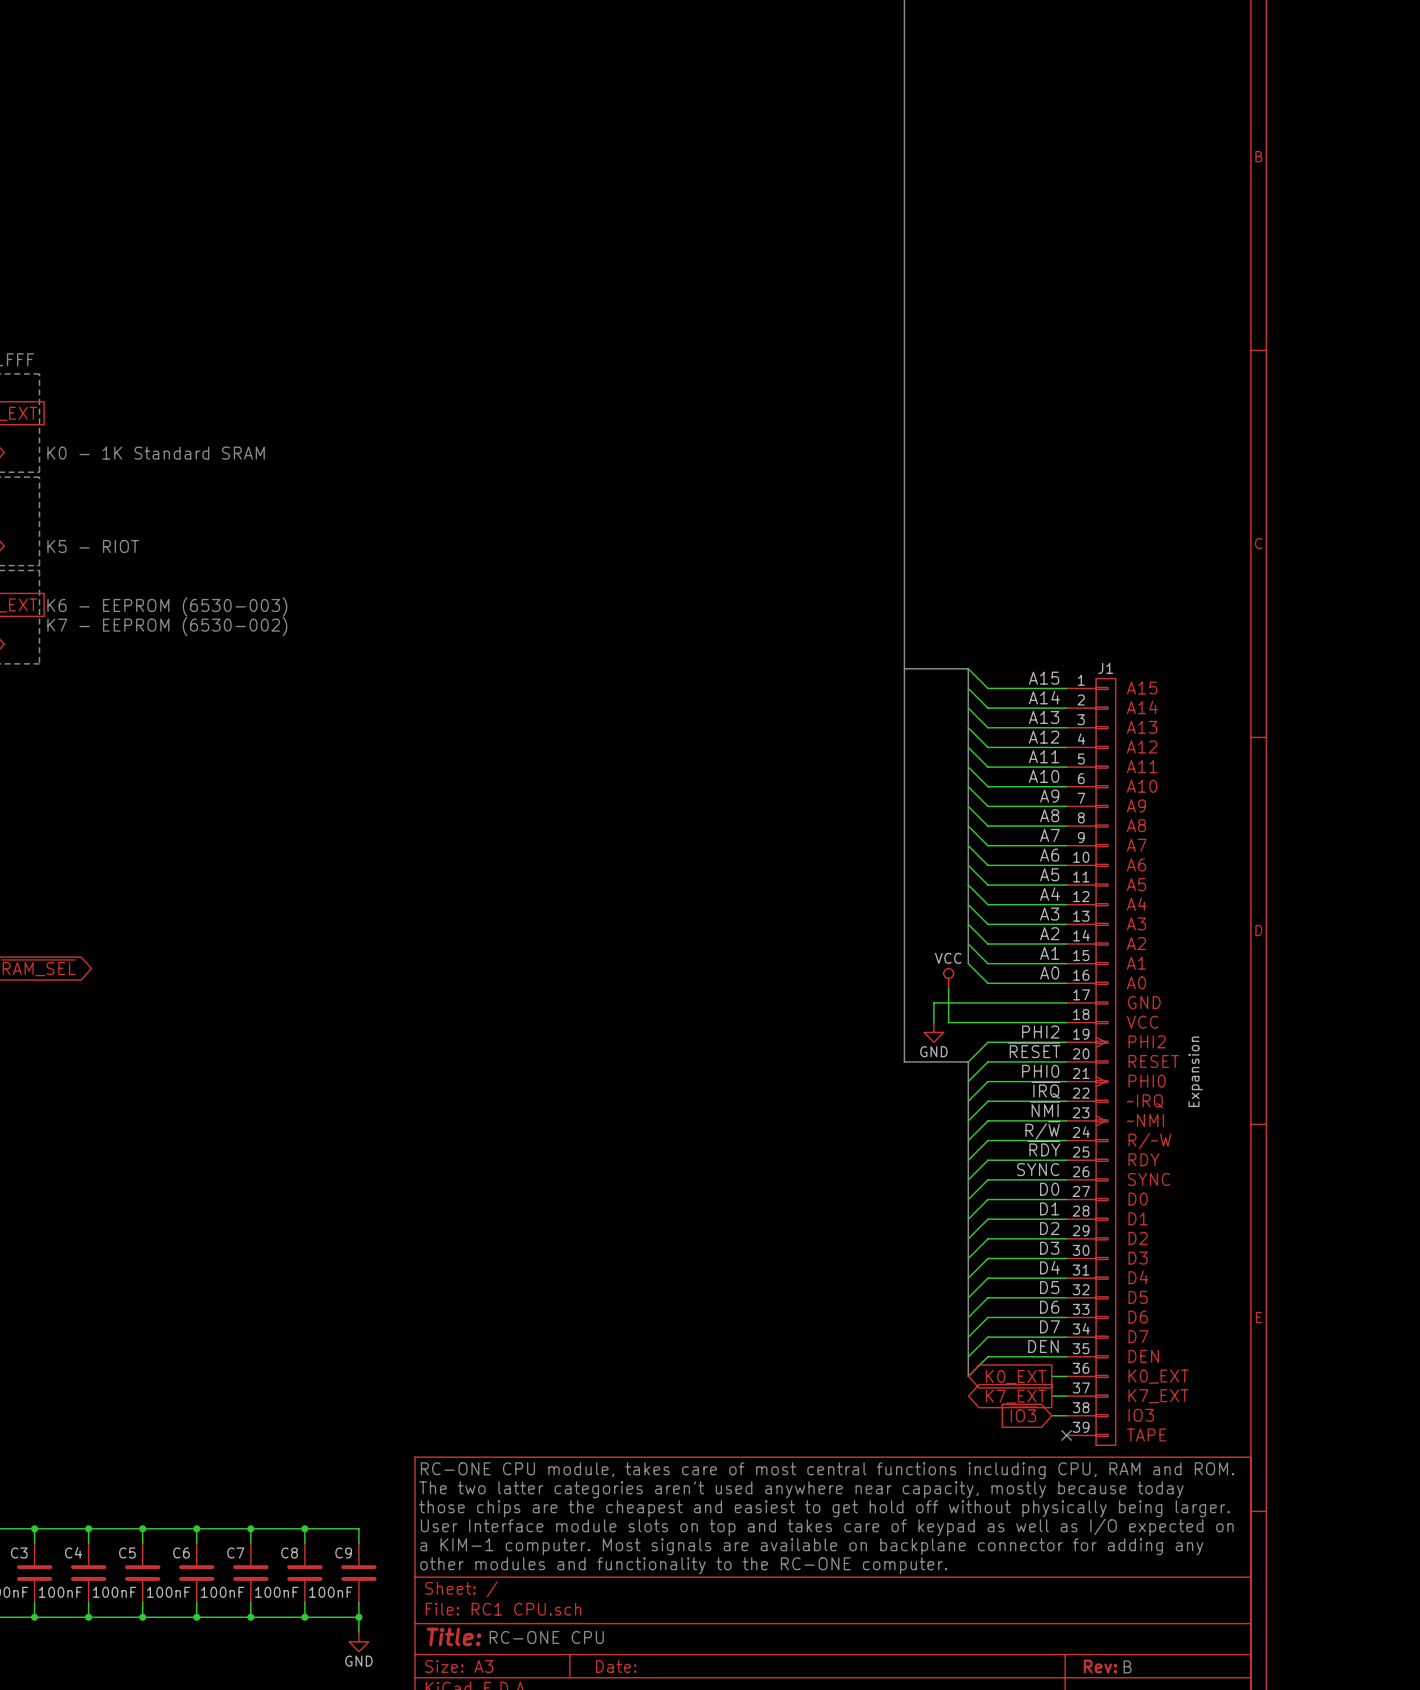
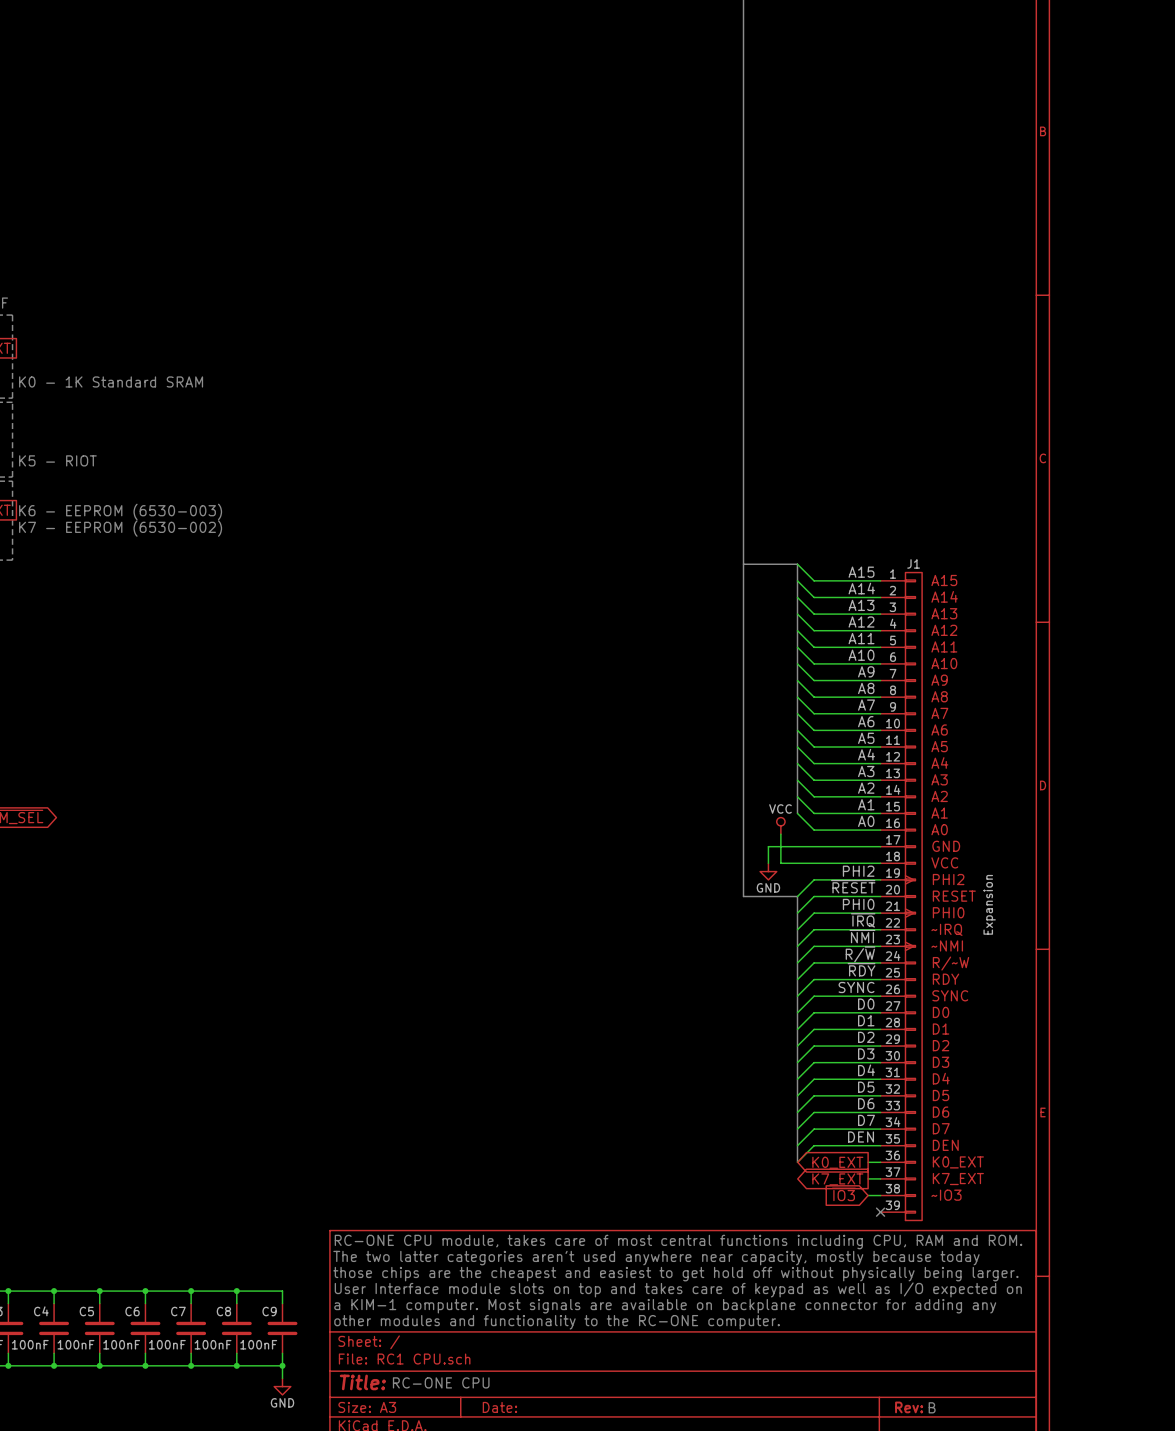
J1 text: IO3 (1141, 1415) -> ~IO3 (946, 1195)
J1 text: TAPE (1146, 1434) -> none

